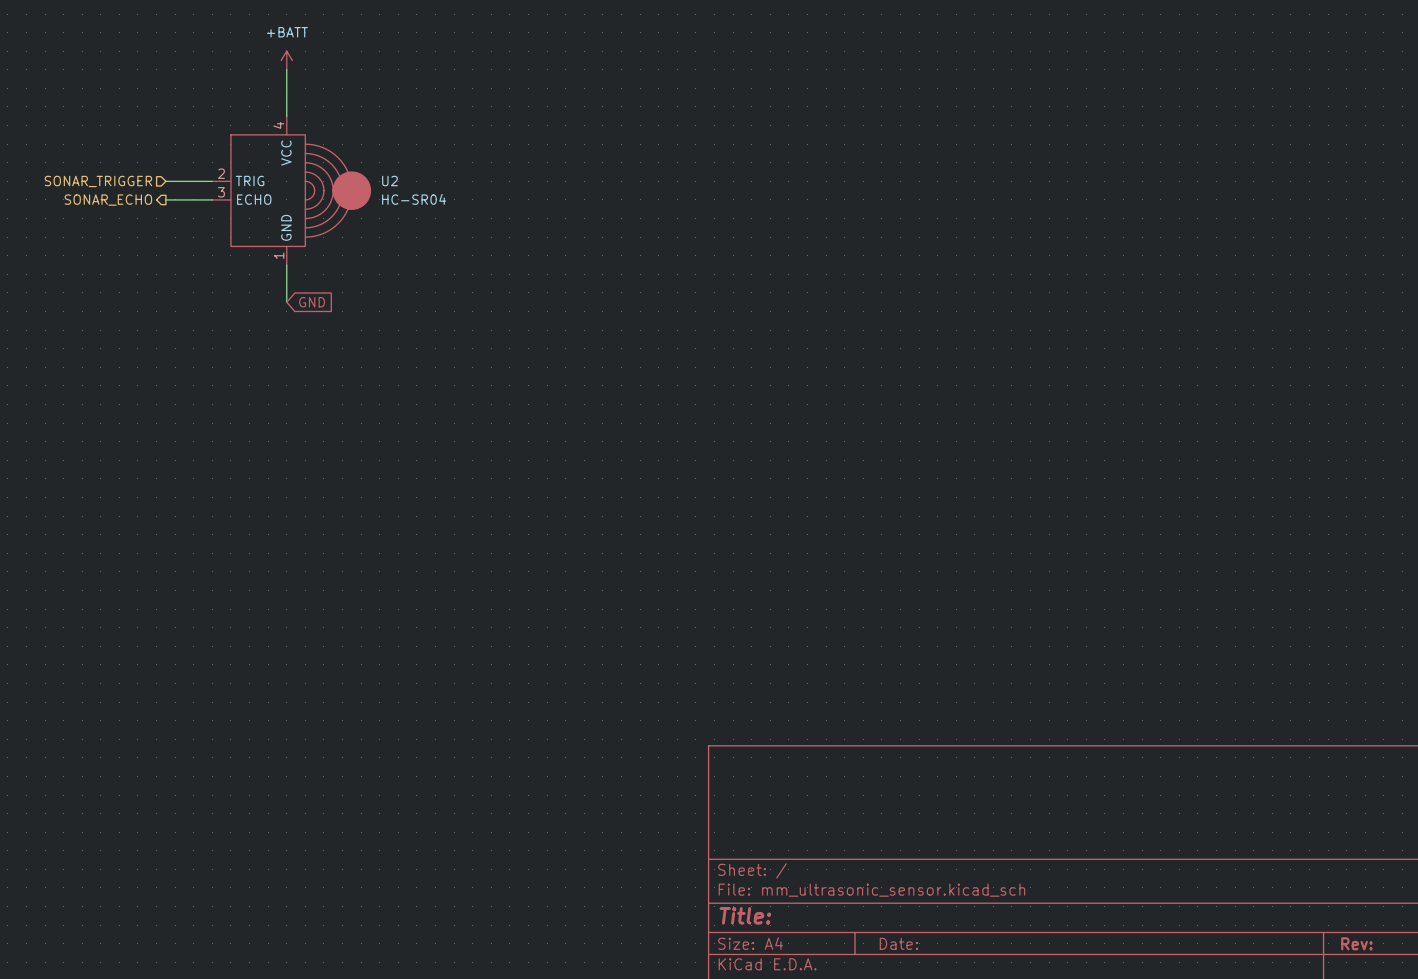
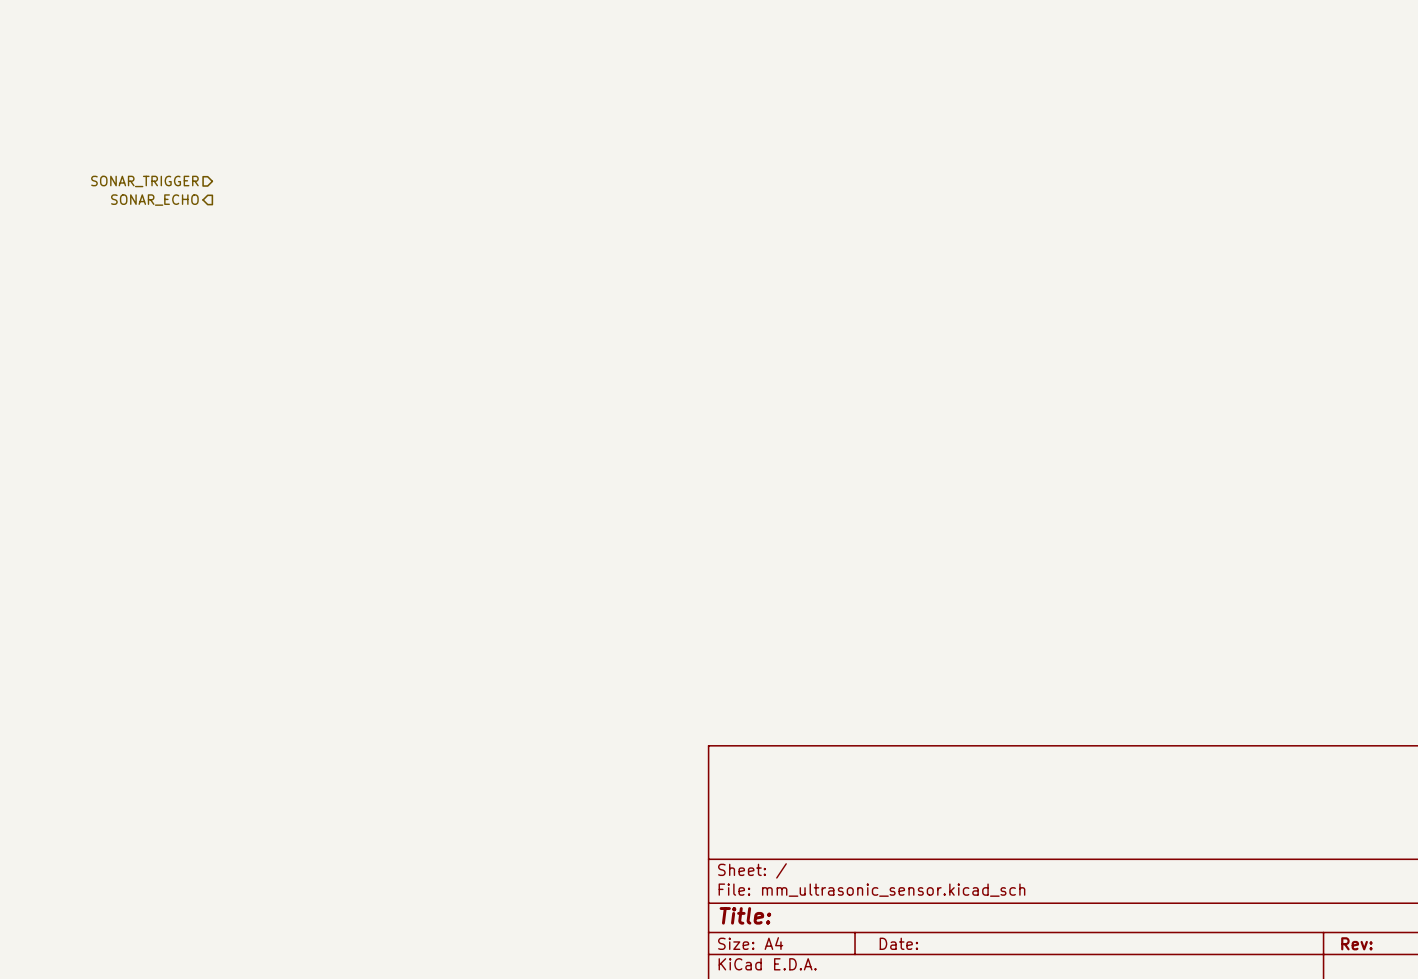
power symbol: +BATT (286, 60) -> none
wire: (286, 69) (286, 116) -> none
hierarchical label position: SONAR_TRIGGER (98, 181) -> SONAR_TRIGGER (144, 181)
wire: (165, 181) (212, 181) -> none
U2: HC-SR04 (291, 190) -> none
wire: (165, 199) (212, 199) -> none
hierarchical label position: SONAR_ECHO (108, 200) -> SONAR_ECHO (154, 200)
wire: (286, 265) (286, 302) -> none
global label: GND (312, 302) -> none

